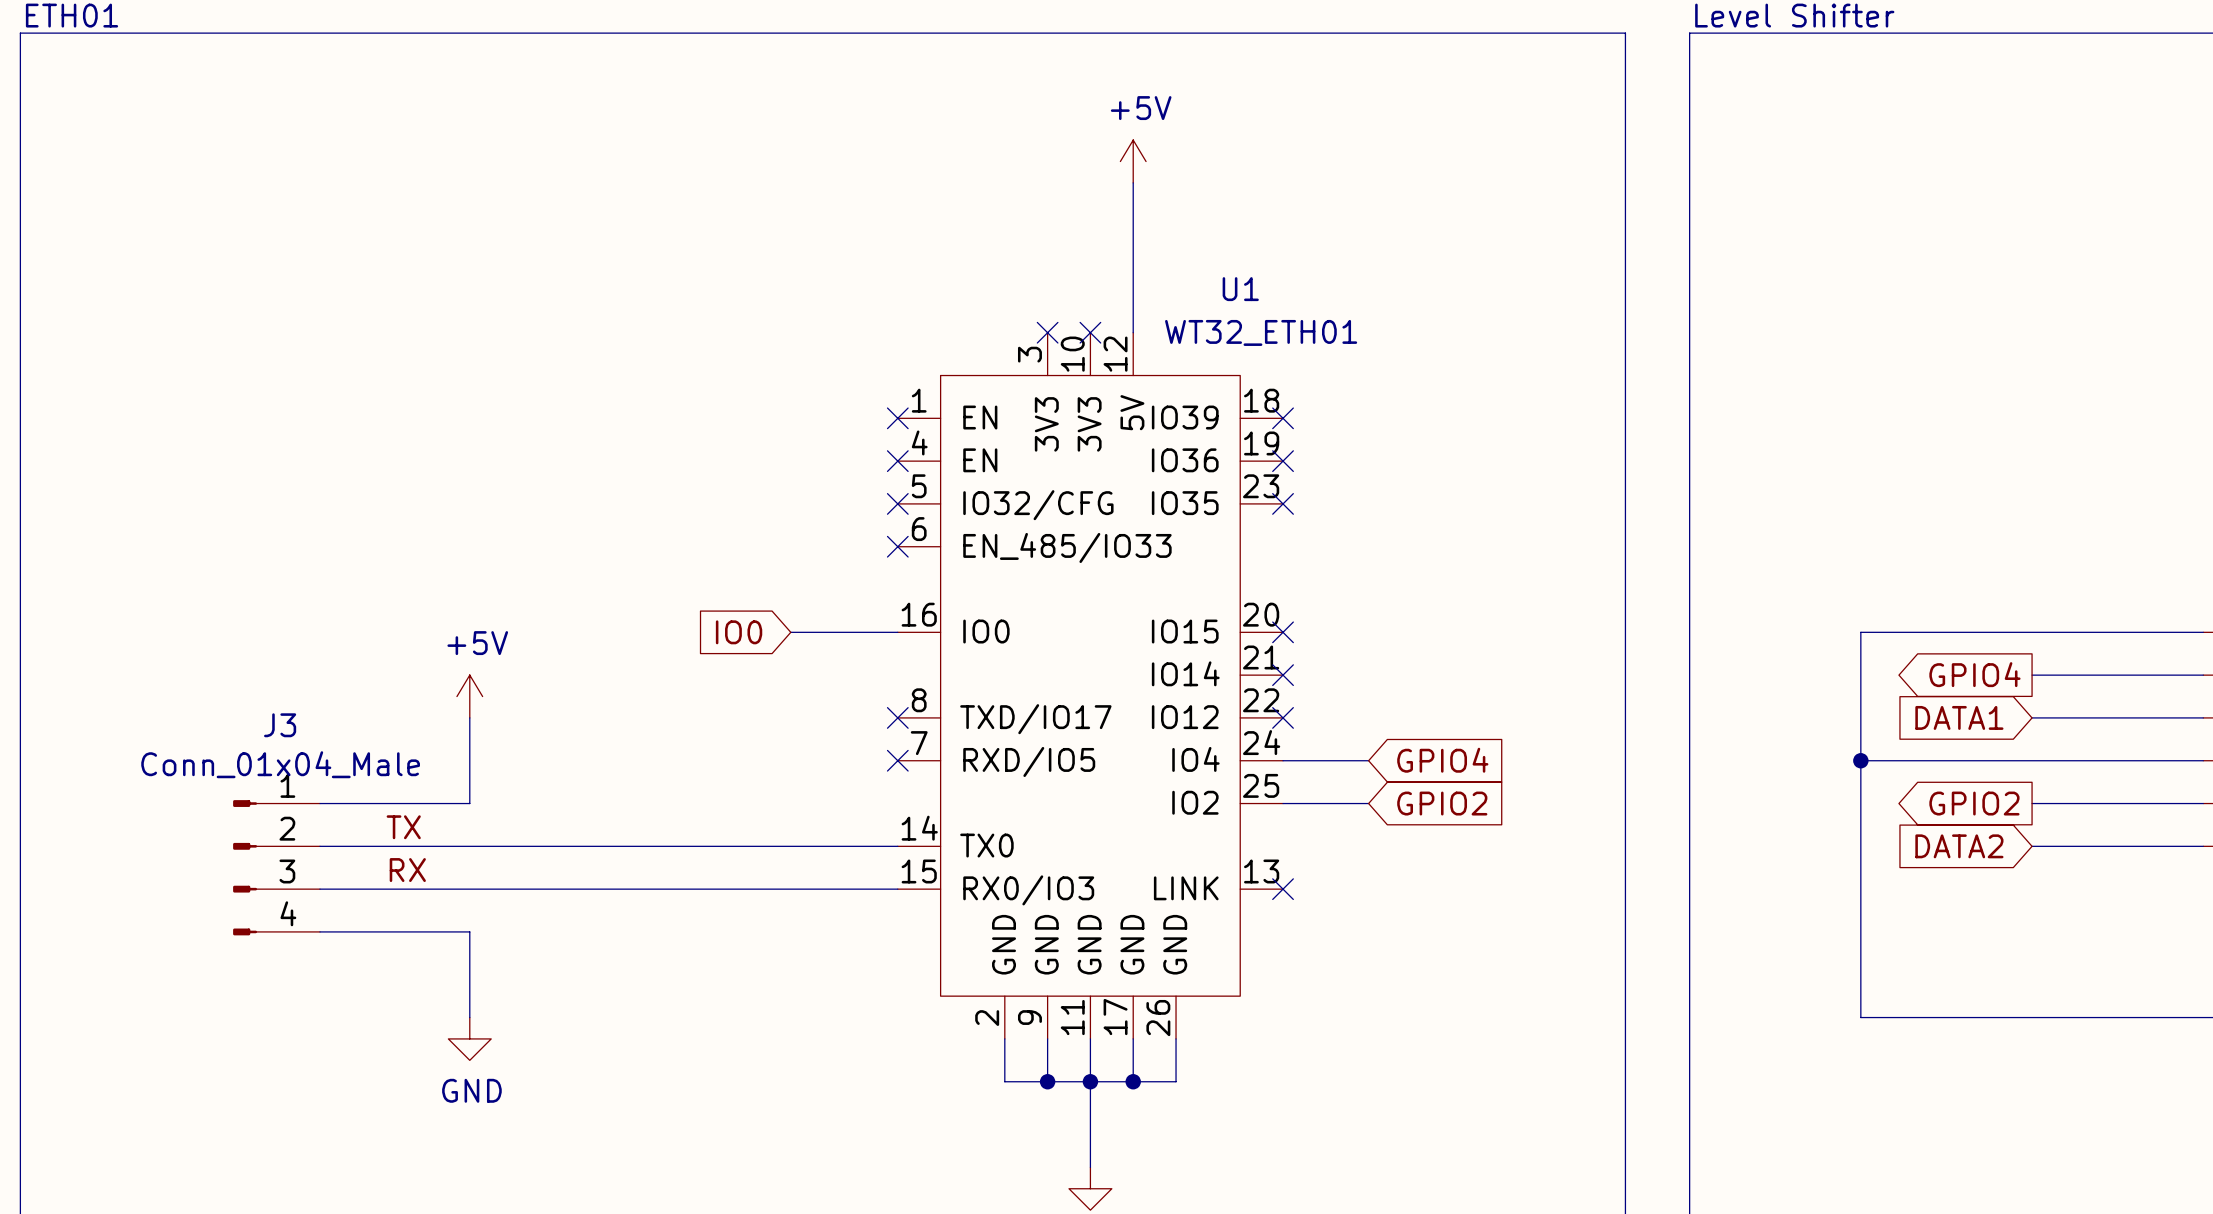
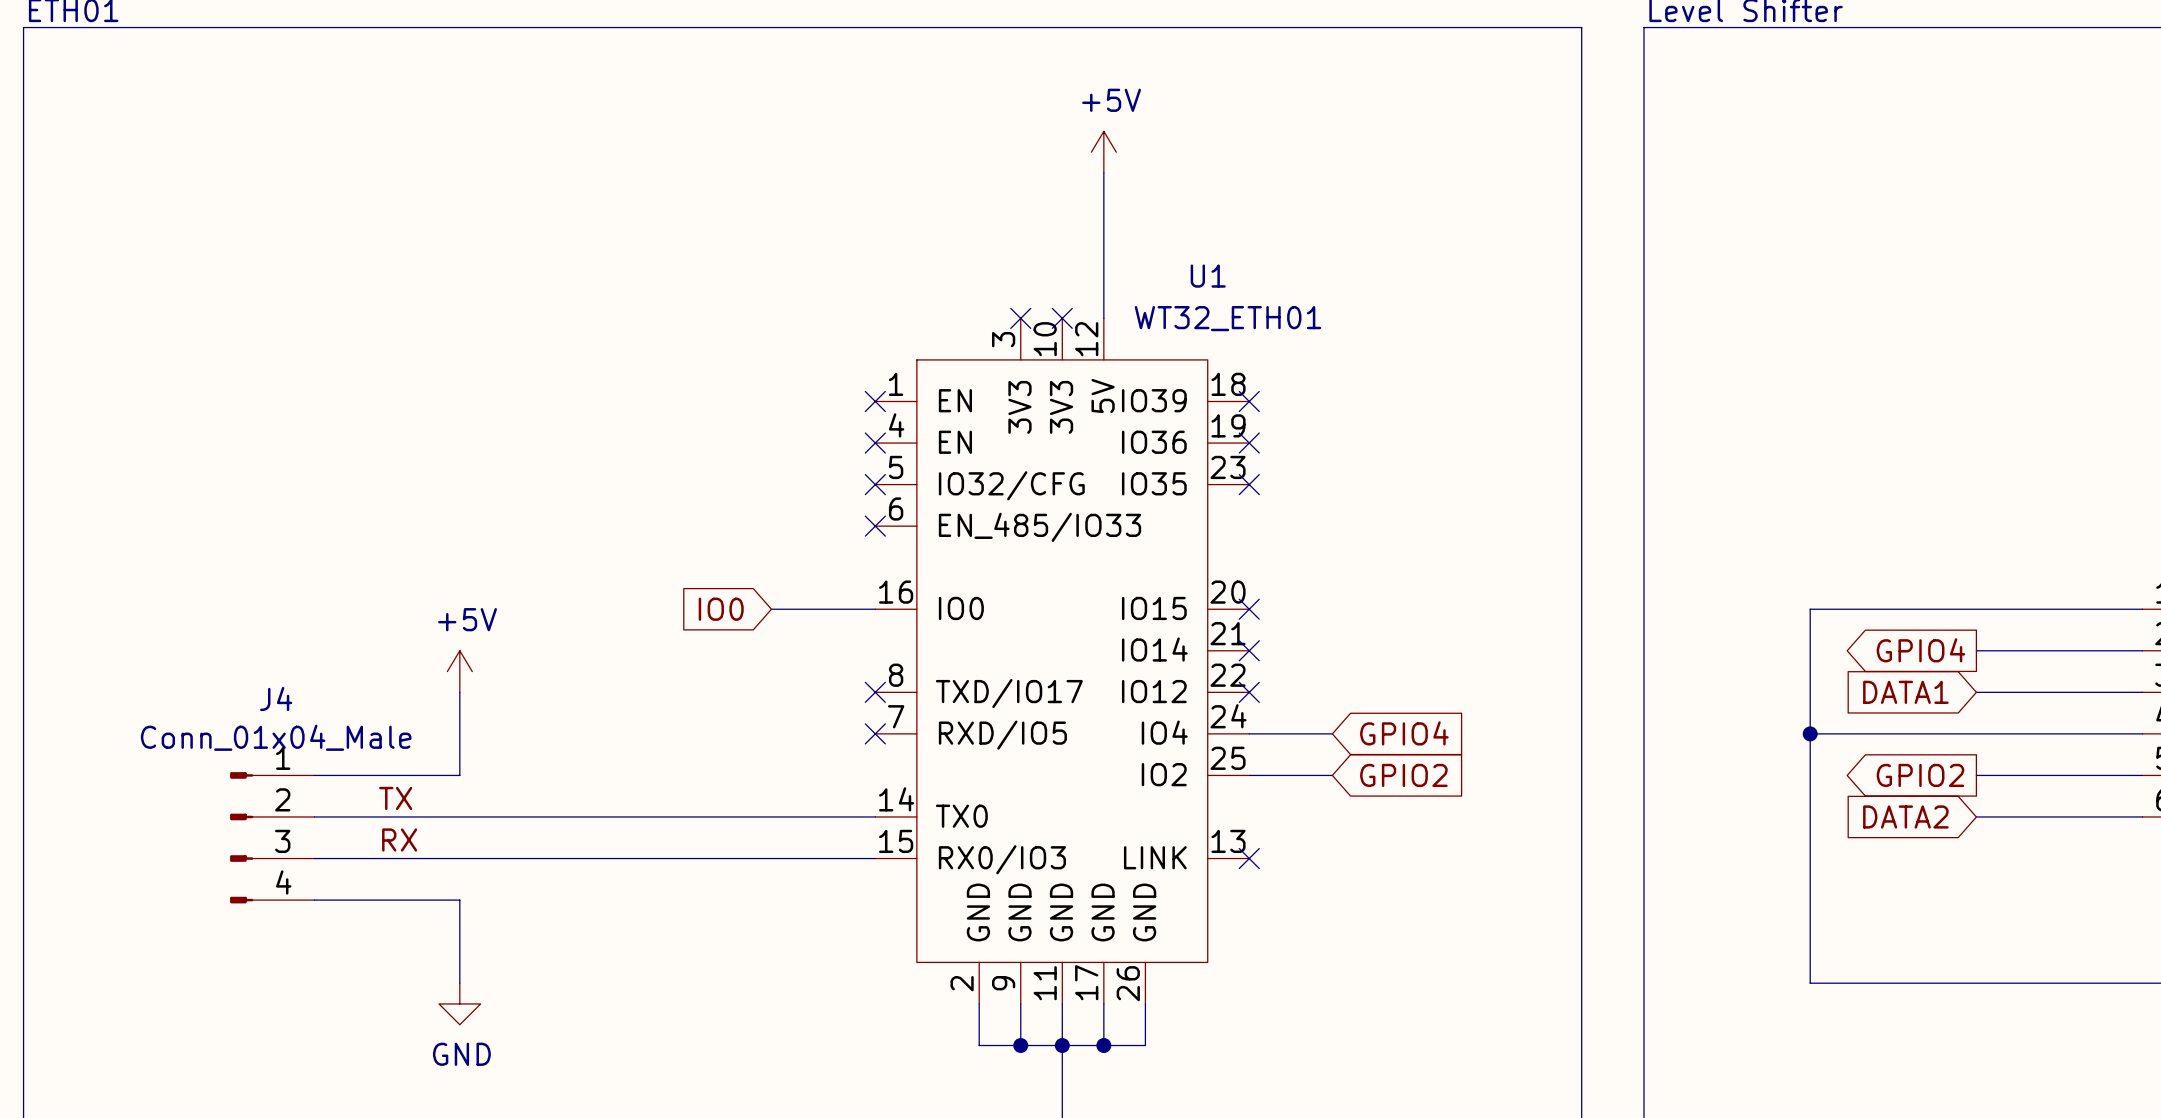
J3 name: J3 (280, 725) -> J4 (276, 698)

